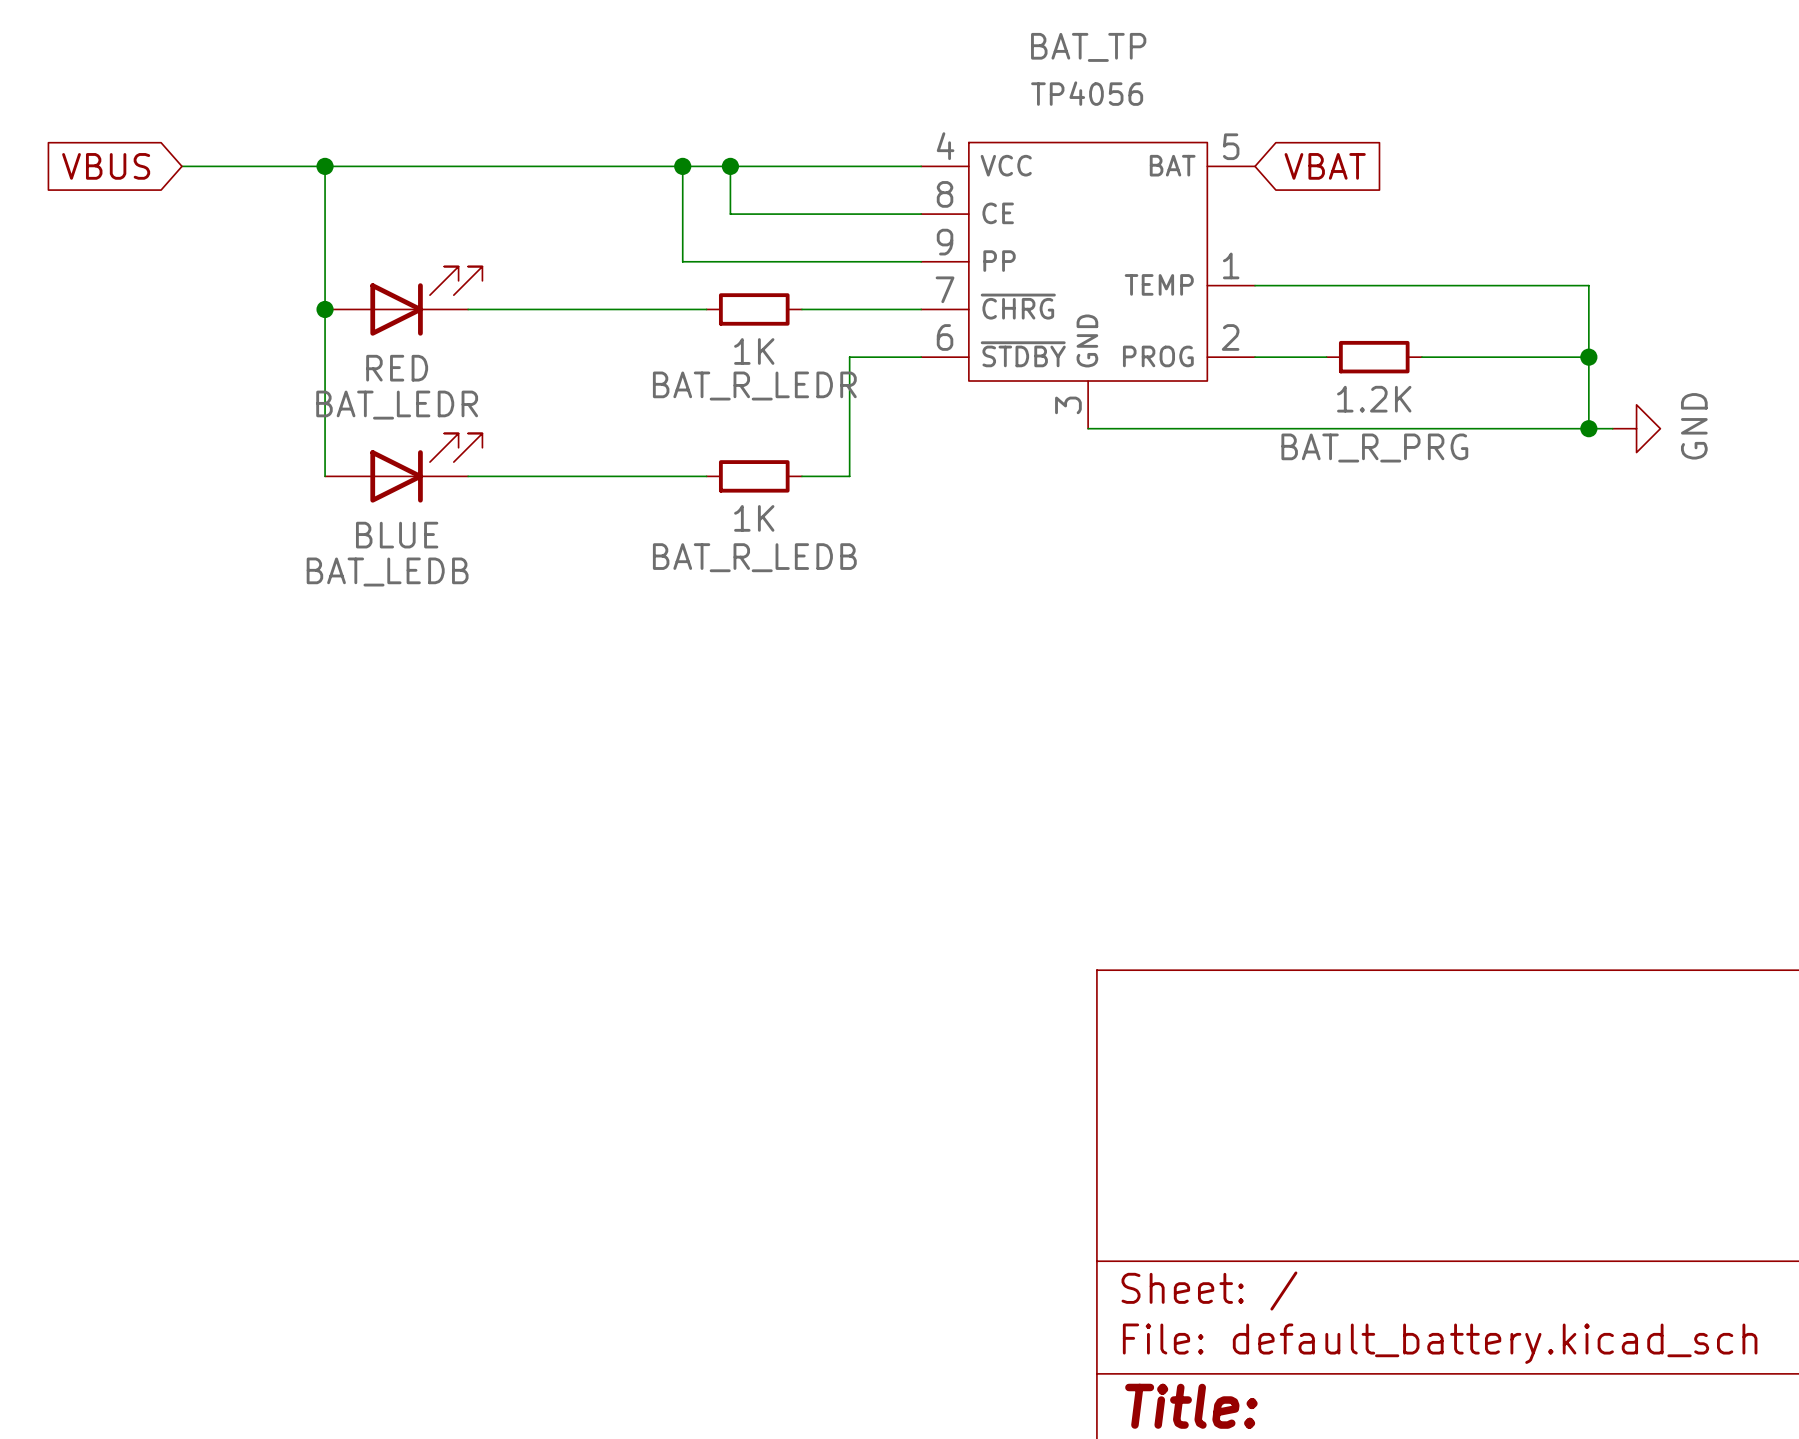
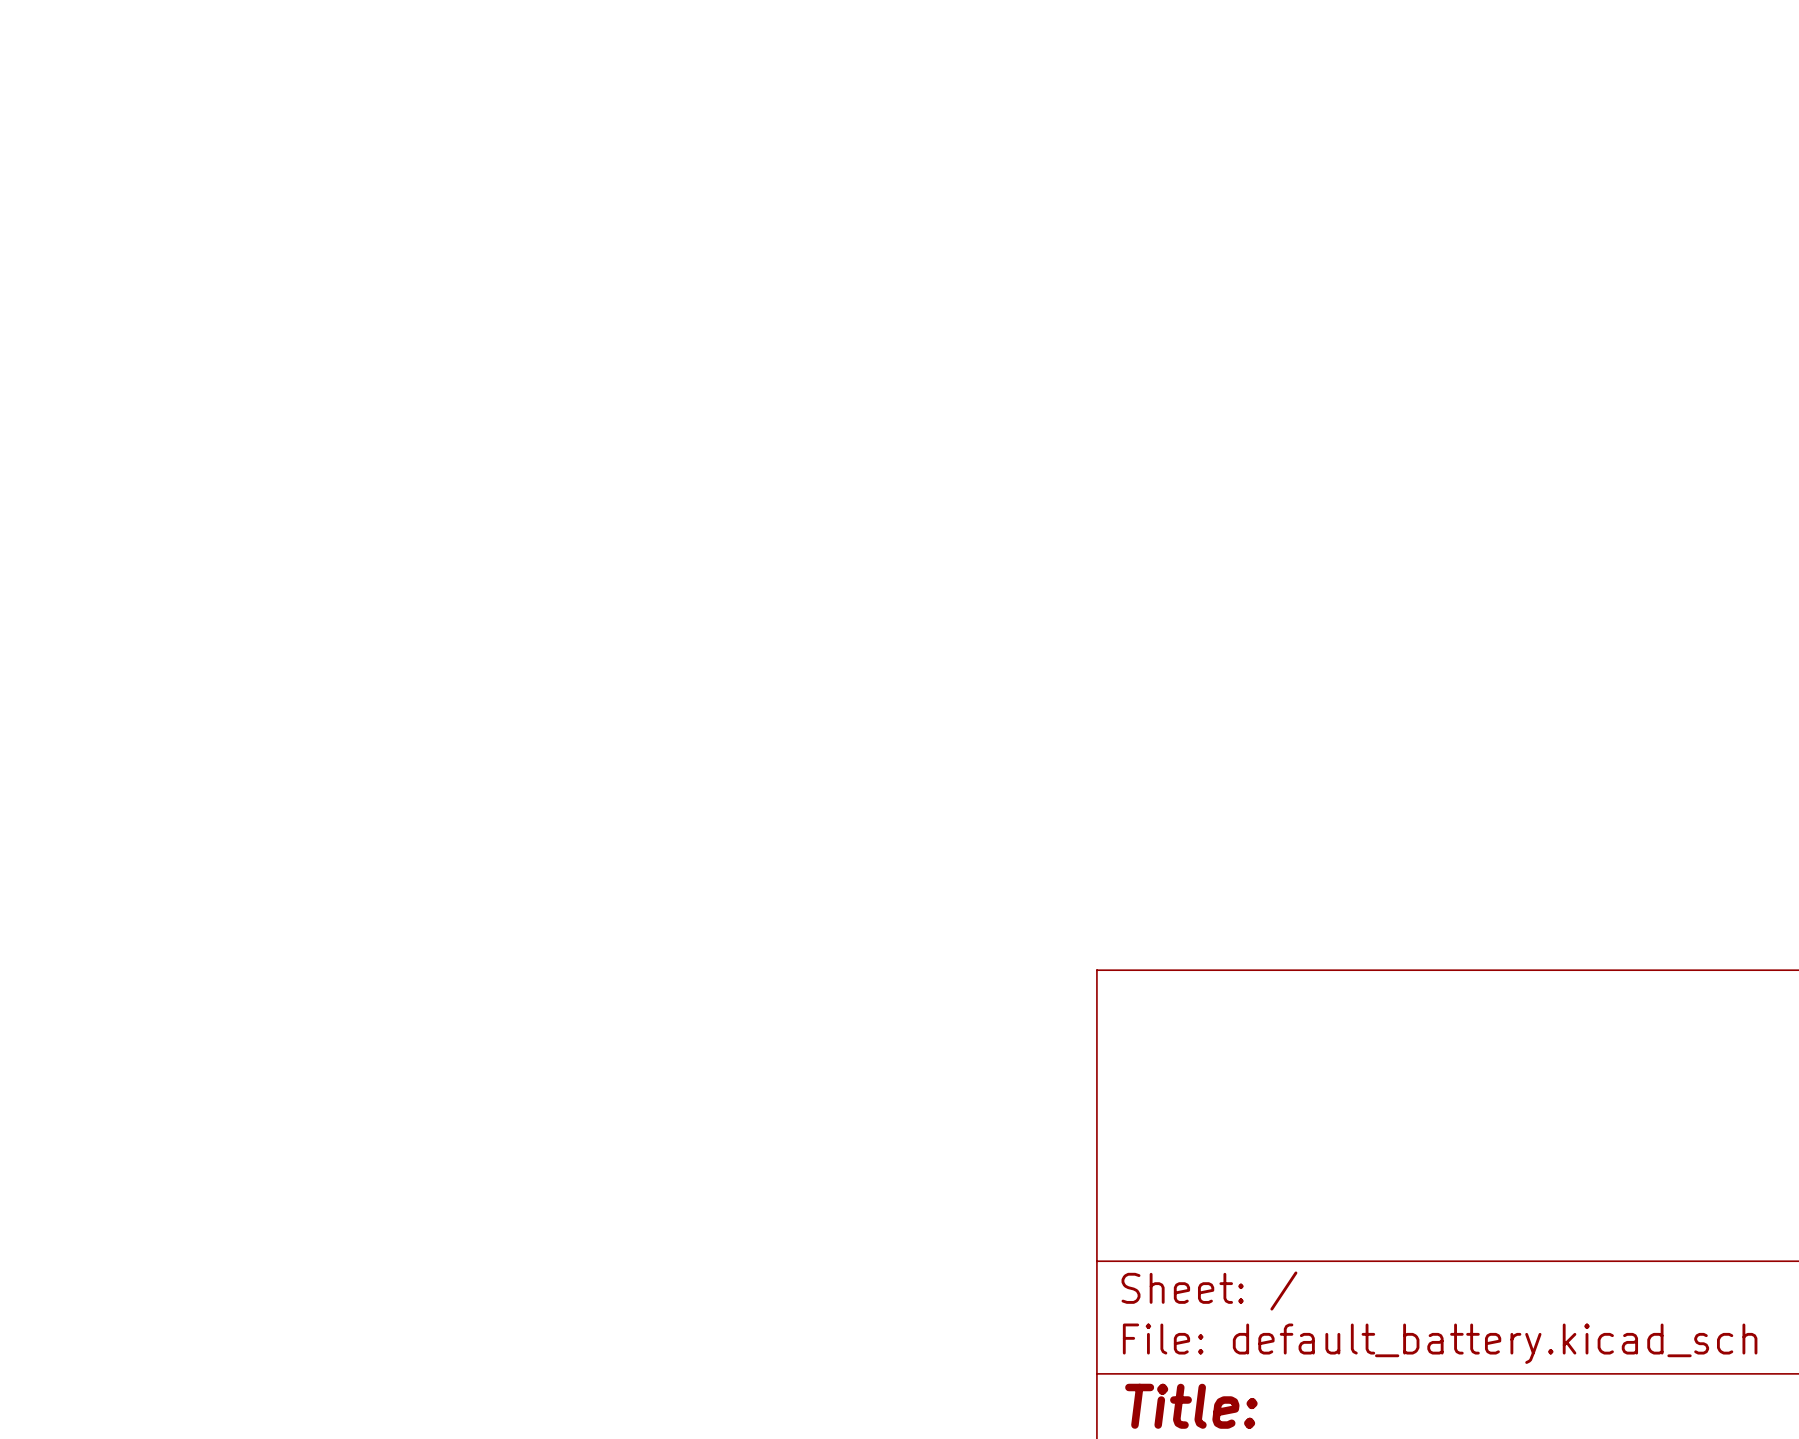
global label: VBUS (106, 166) -> none
wire: (181, 166) (921, 166) -> none
wire: (325, 166) (325, 476) -> none
junction: (325, 166) -> none
wire: (682, 166) (682, 261) (921, 261) -> none
junction: (682, 166) -> none
wire: (730, 166) (730, 214) (921, 214) -> none
junction: (730, 166) -> none
global label: VBAT (1325, 166) -> none
BAT_TP: TP4056 (1088, 285) -> none
wire: (1255, 285) (1588, 285) (1588, 428) -> none
BAT_LEDR: RED (403, 301) -> none
junction: (325, 309) -> none
wire: (468, 309) (706, 309) -> none
BAT_R_LEDR: 1K (754, 309) -> none
wire: (801, 309) (921, 309) -> none
wire: (921, 357) (849, 357) (849, 476) (801, 476) -> none
wire: (1255, 357) (1326, 357) -> none
BAT_R_PRG: 1.2K (1374, 357) -> none
wire: (1421, 357) (1588, 357) -> none
junction: (1588, 357) -> none
wire: (1088, 428) (1612, 428) -> none
junction: (1588, 428) -> none
power symbol: GND (1636, 428) -> none
BAT_LEDB: BLUE (403, 468) -> none
wire: (468, 476) (706, 476) -> none
BAT_R_LEDB: 1K (754, 476) -> none

